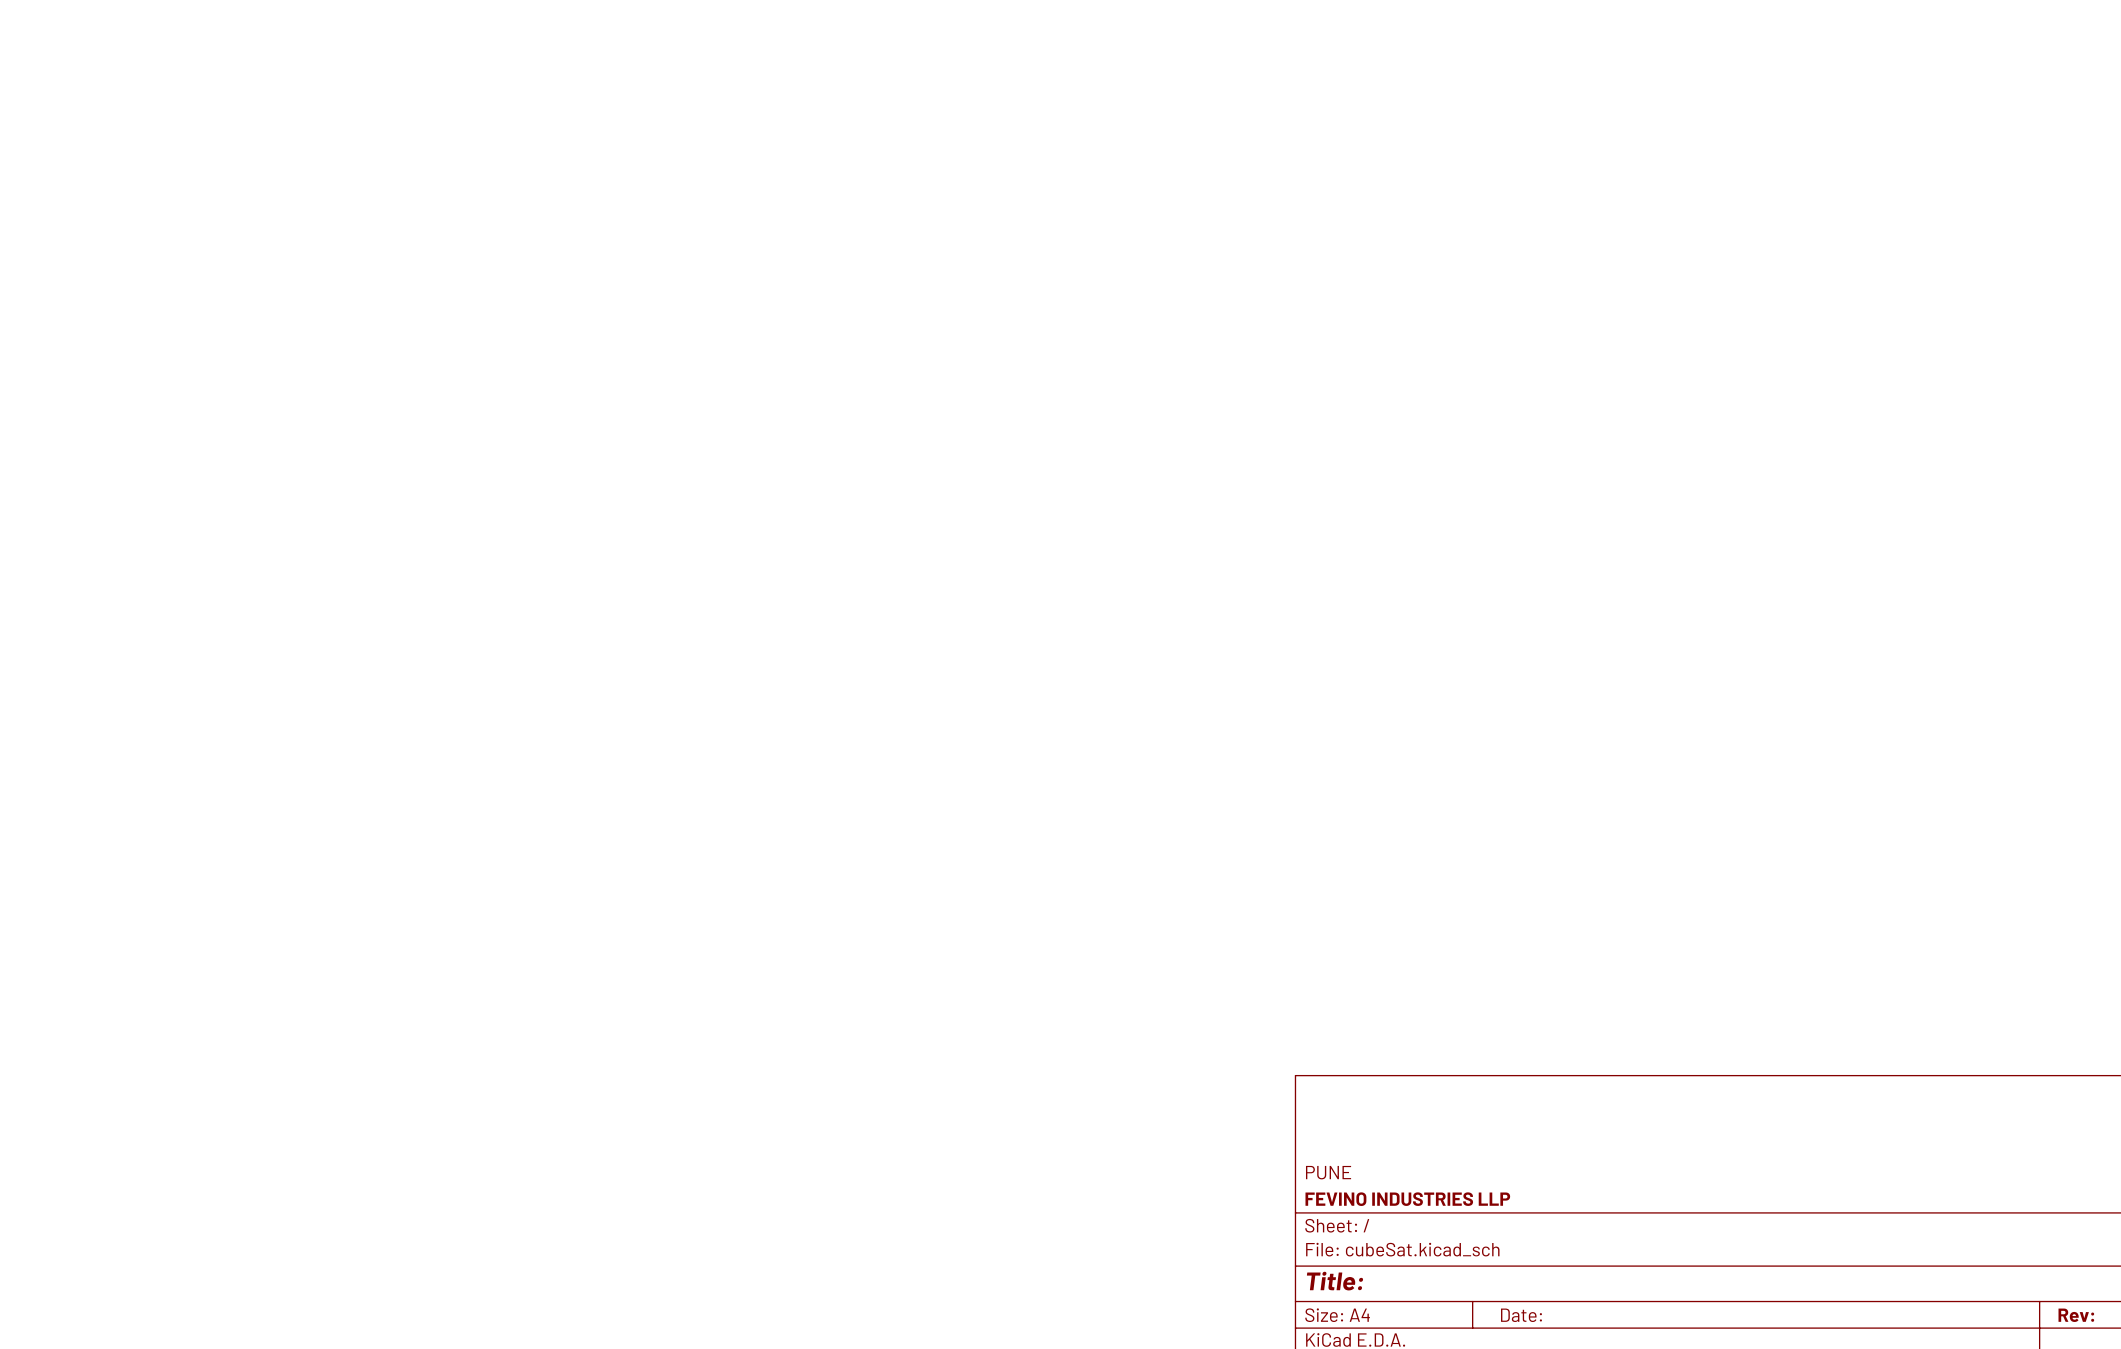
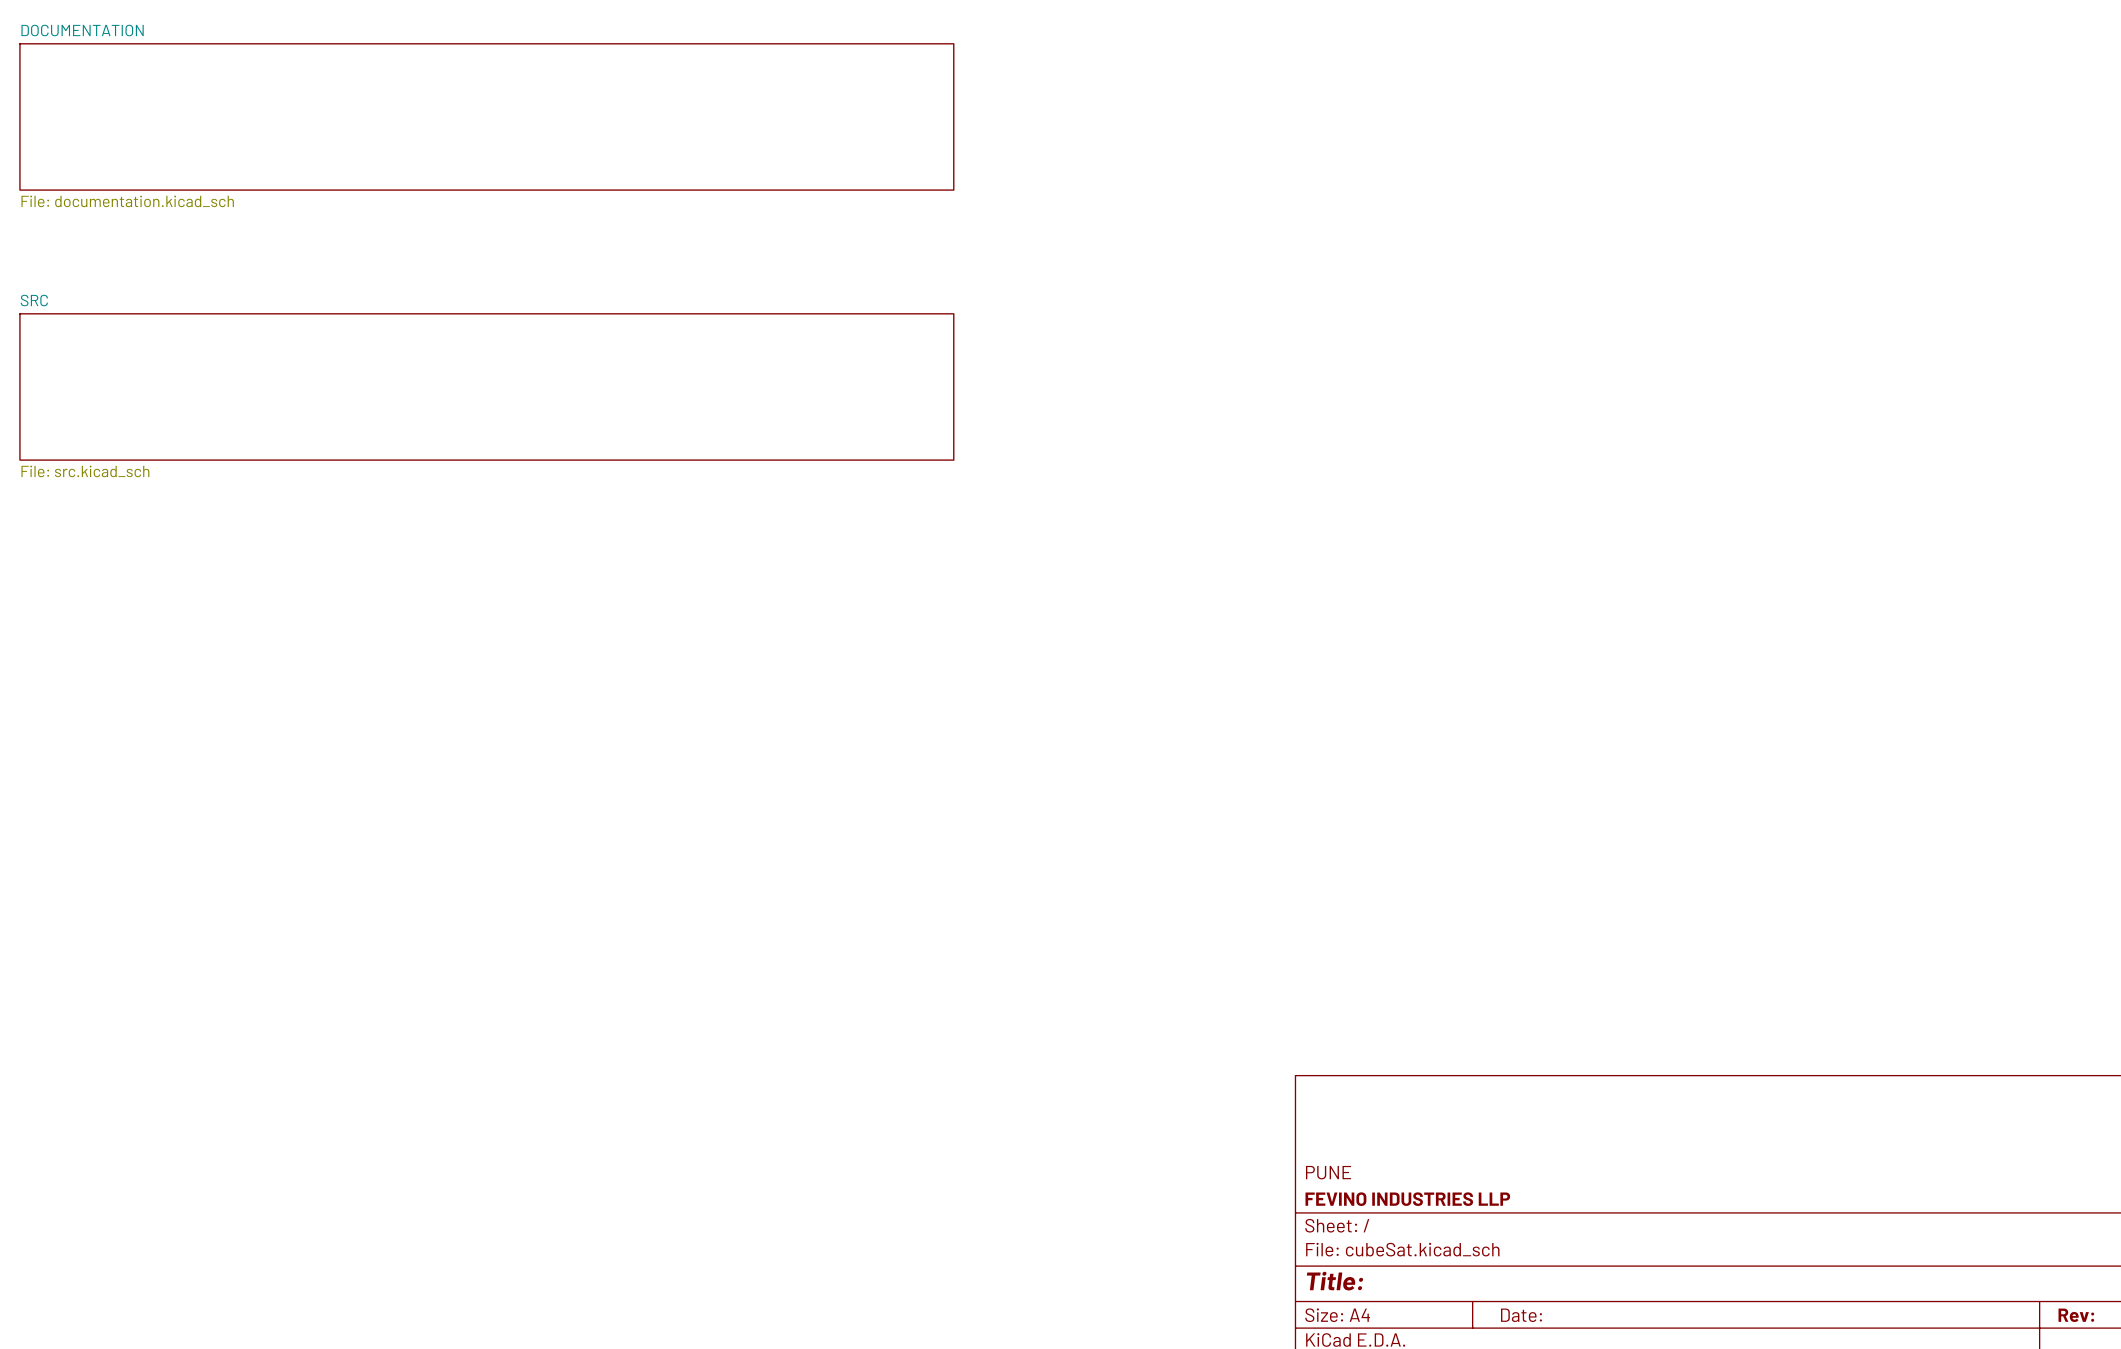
sheet DOCUMENTATION: none -> File: documentation.kicad_sch (486, 116)
sheet SRC: none -> File: src.kicad_sch (486, 386)

